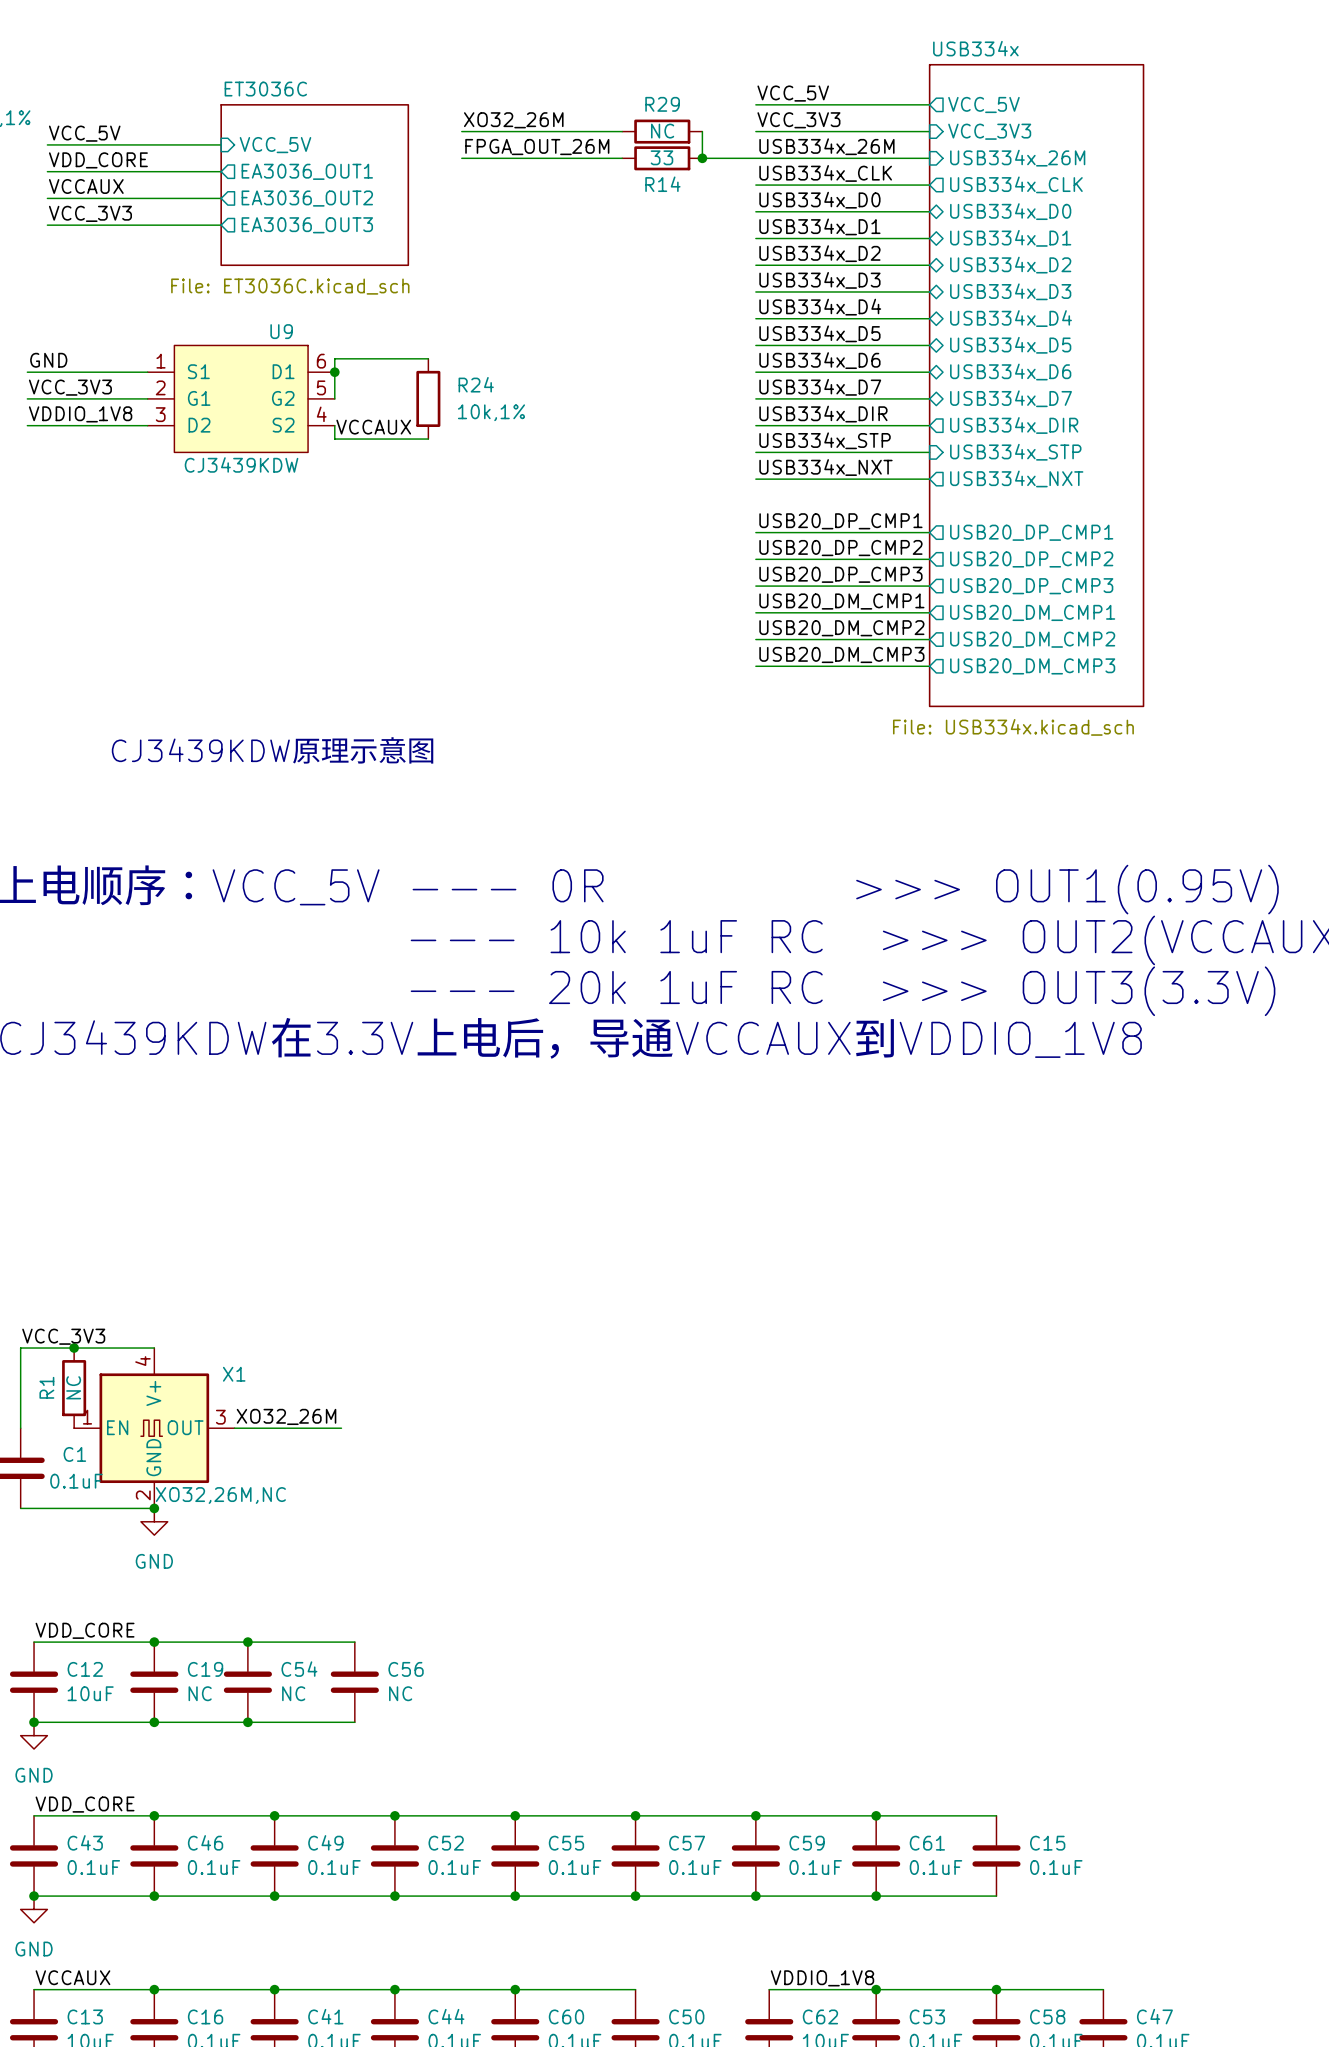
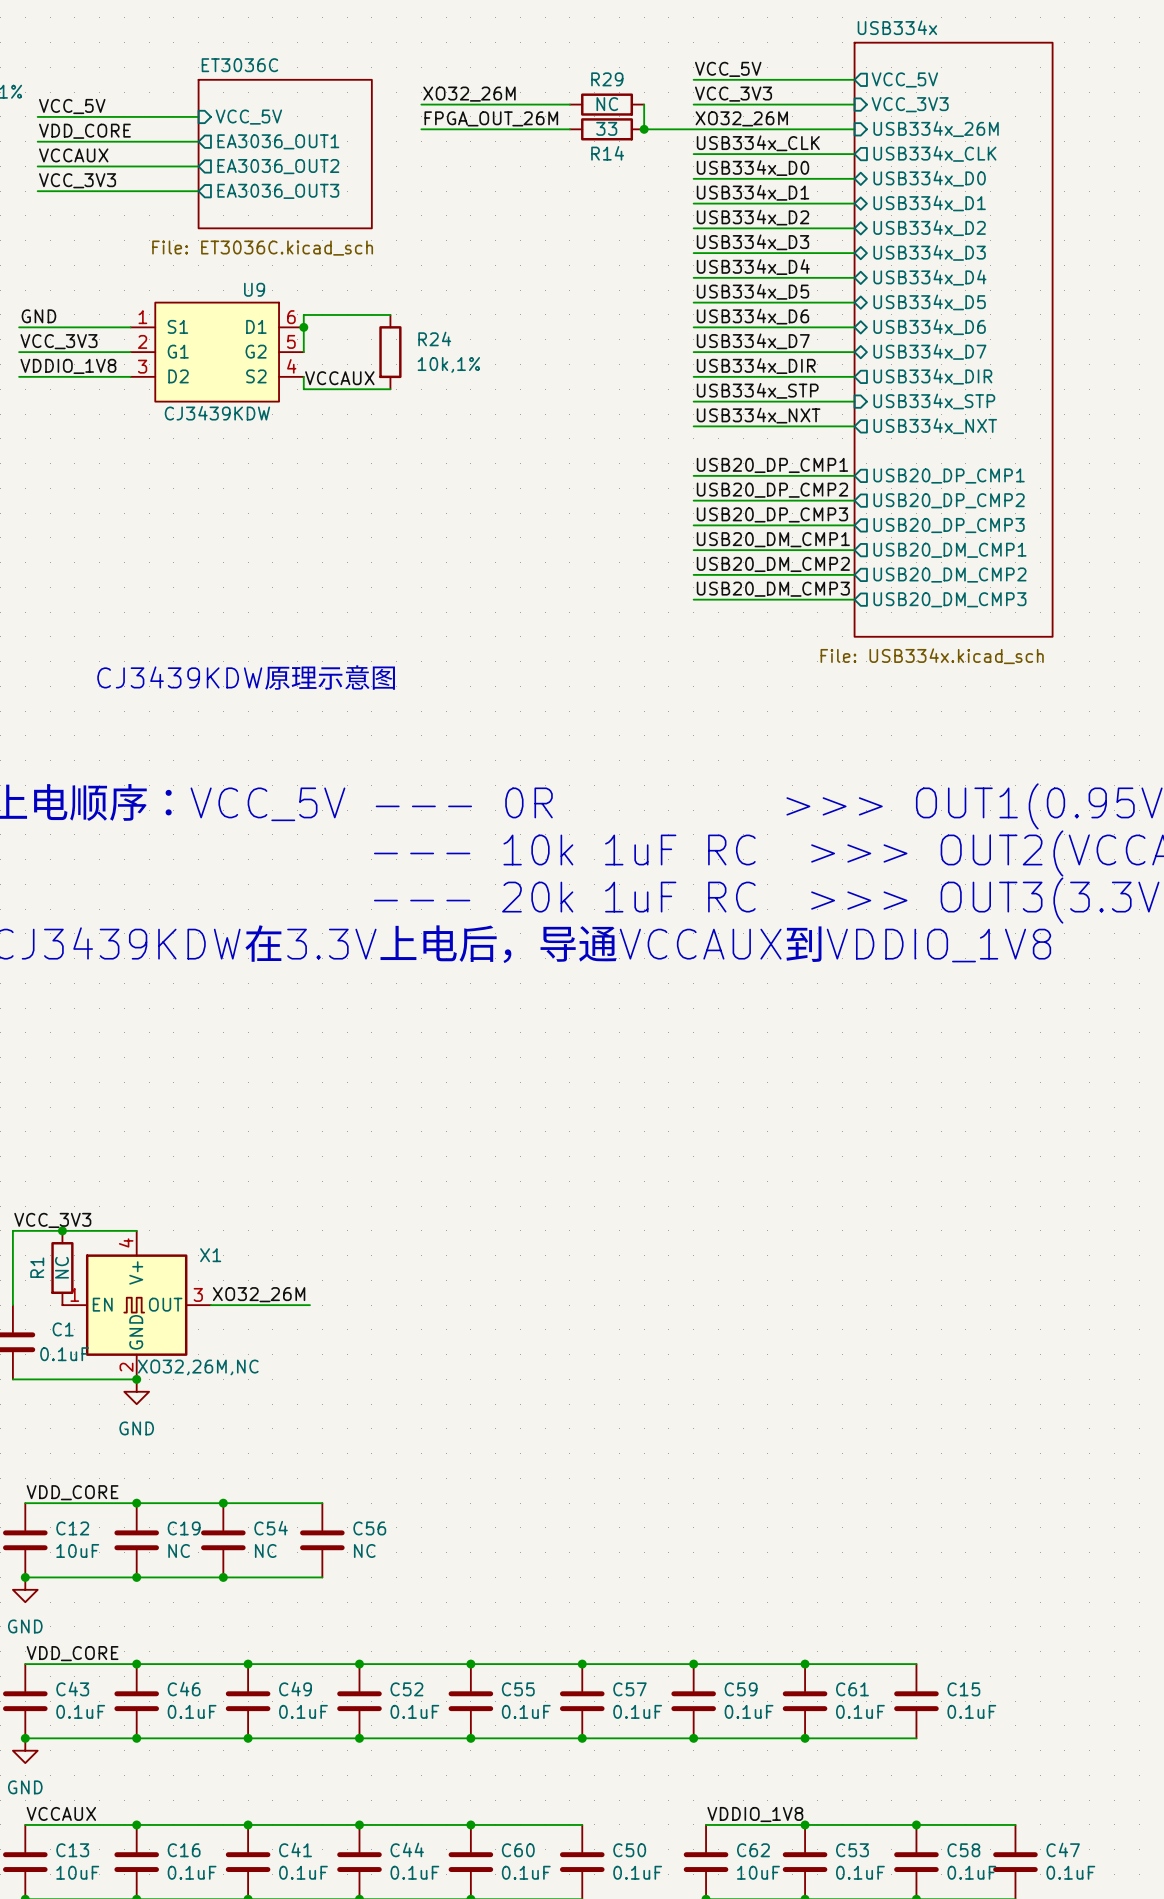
label: USB334x_26M (826, 146) -> XO32_26M (741, 118)

